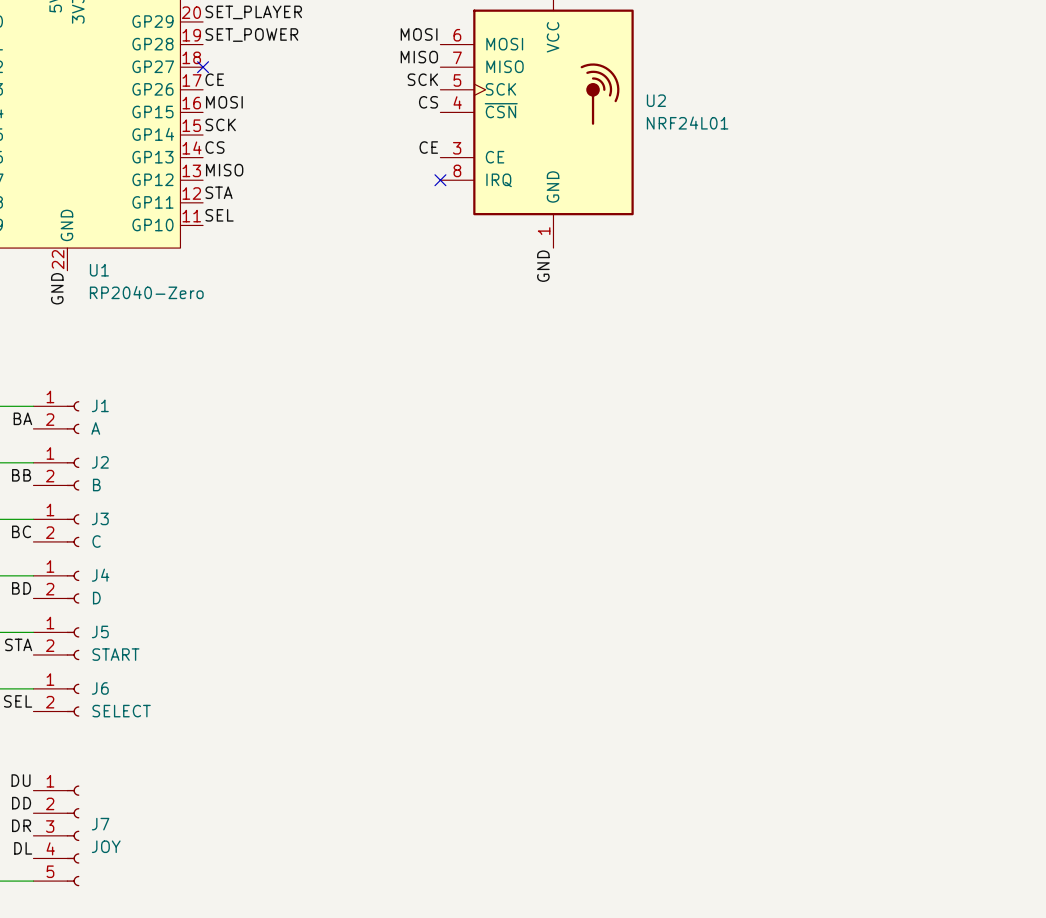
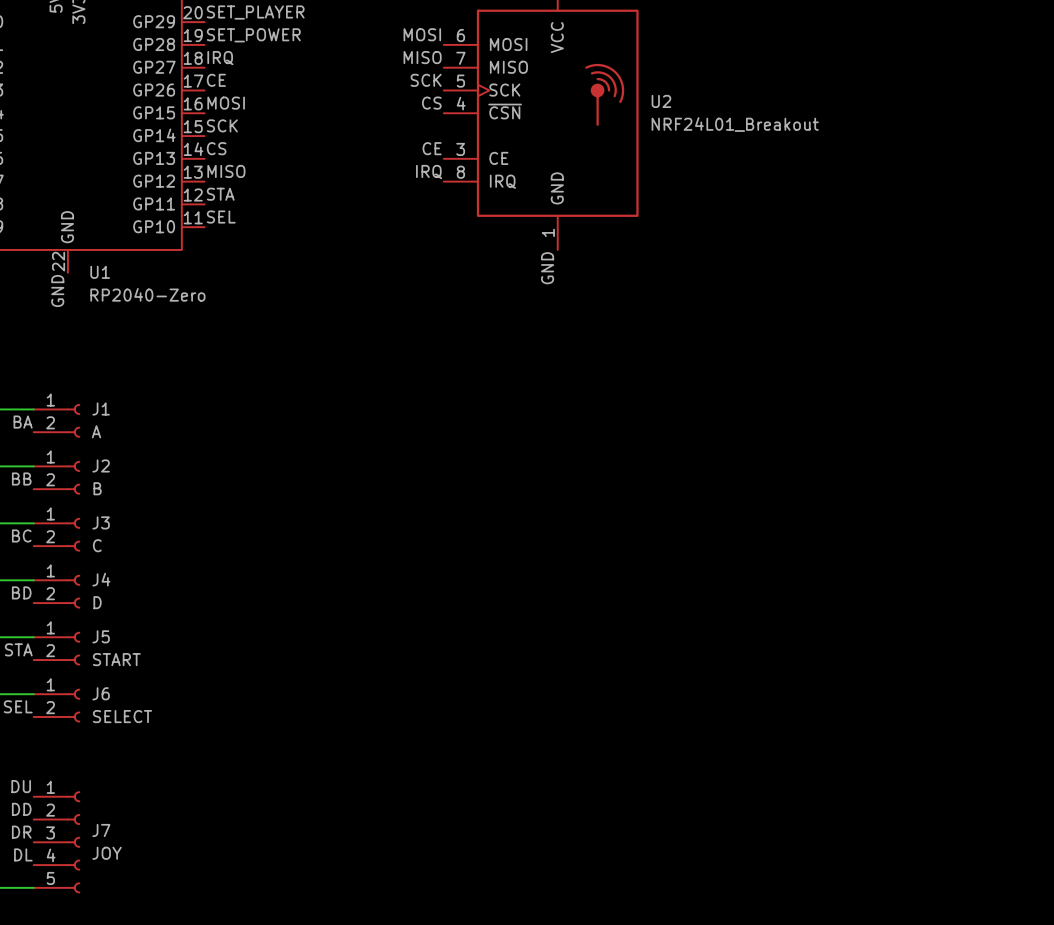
label: none -> IRQ (220, 58)
no-connect mark: (203, 67) -> none
U2 value: NRF24L01 (687, 123) -> NRF24L01_Breakout (735, 124)
label: none -> IRQ (429, 171)
no-connect mark: (440, 180) -> none

